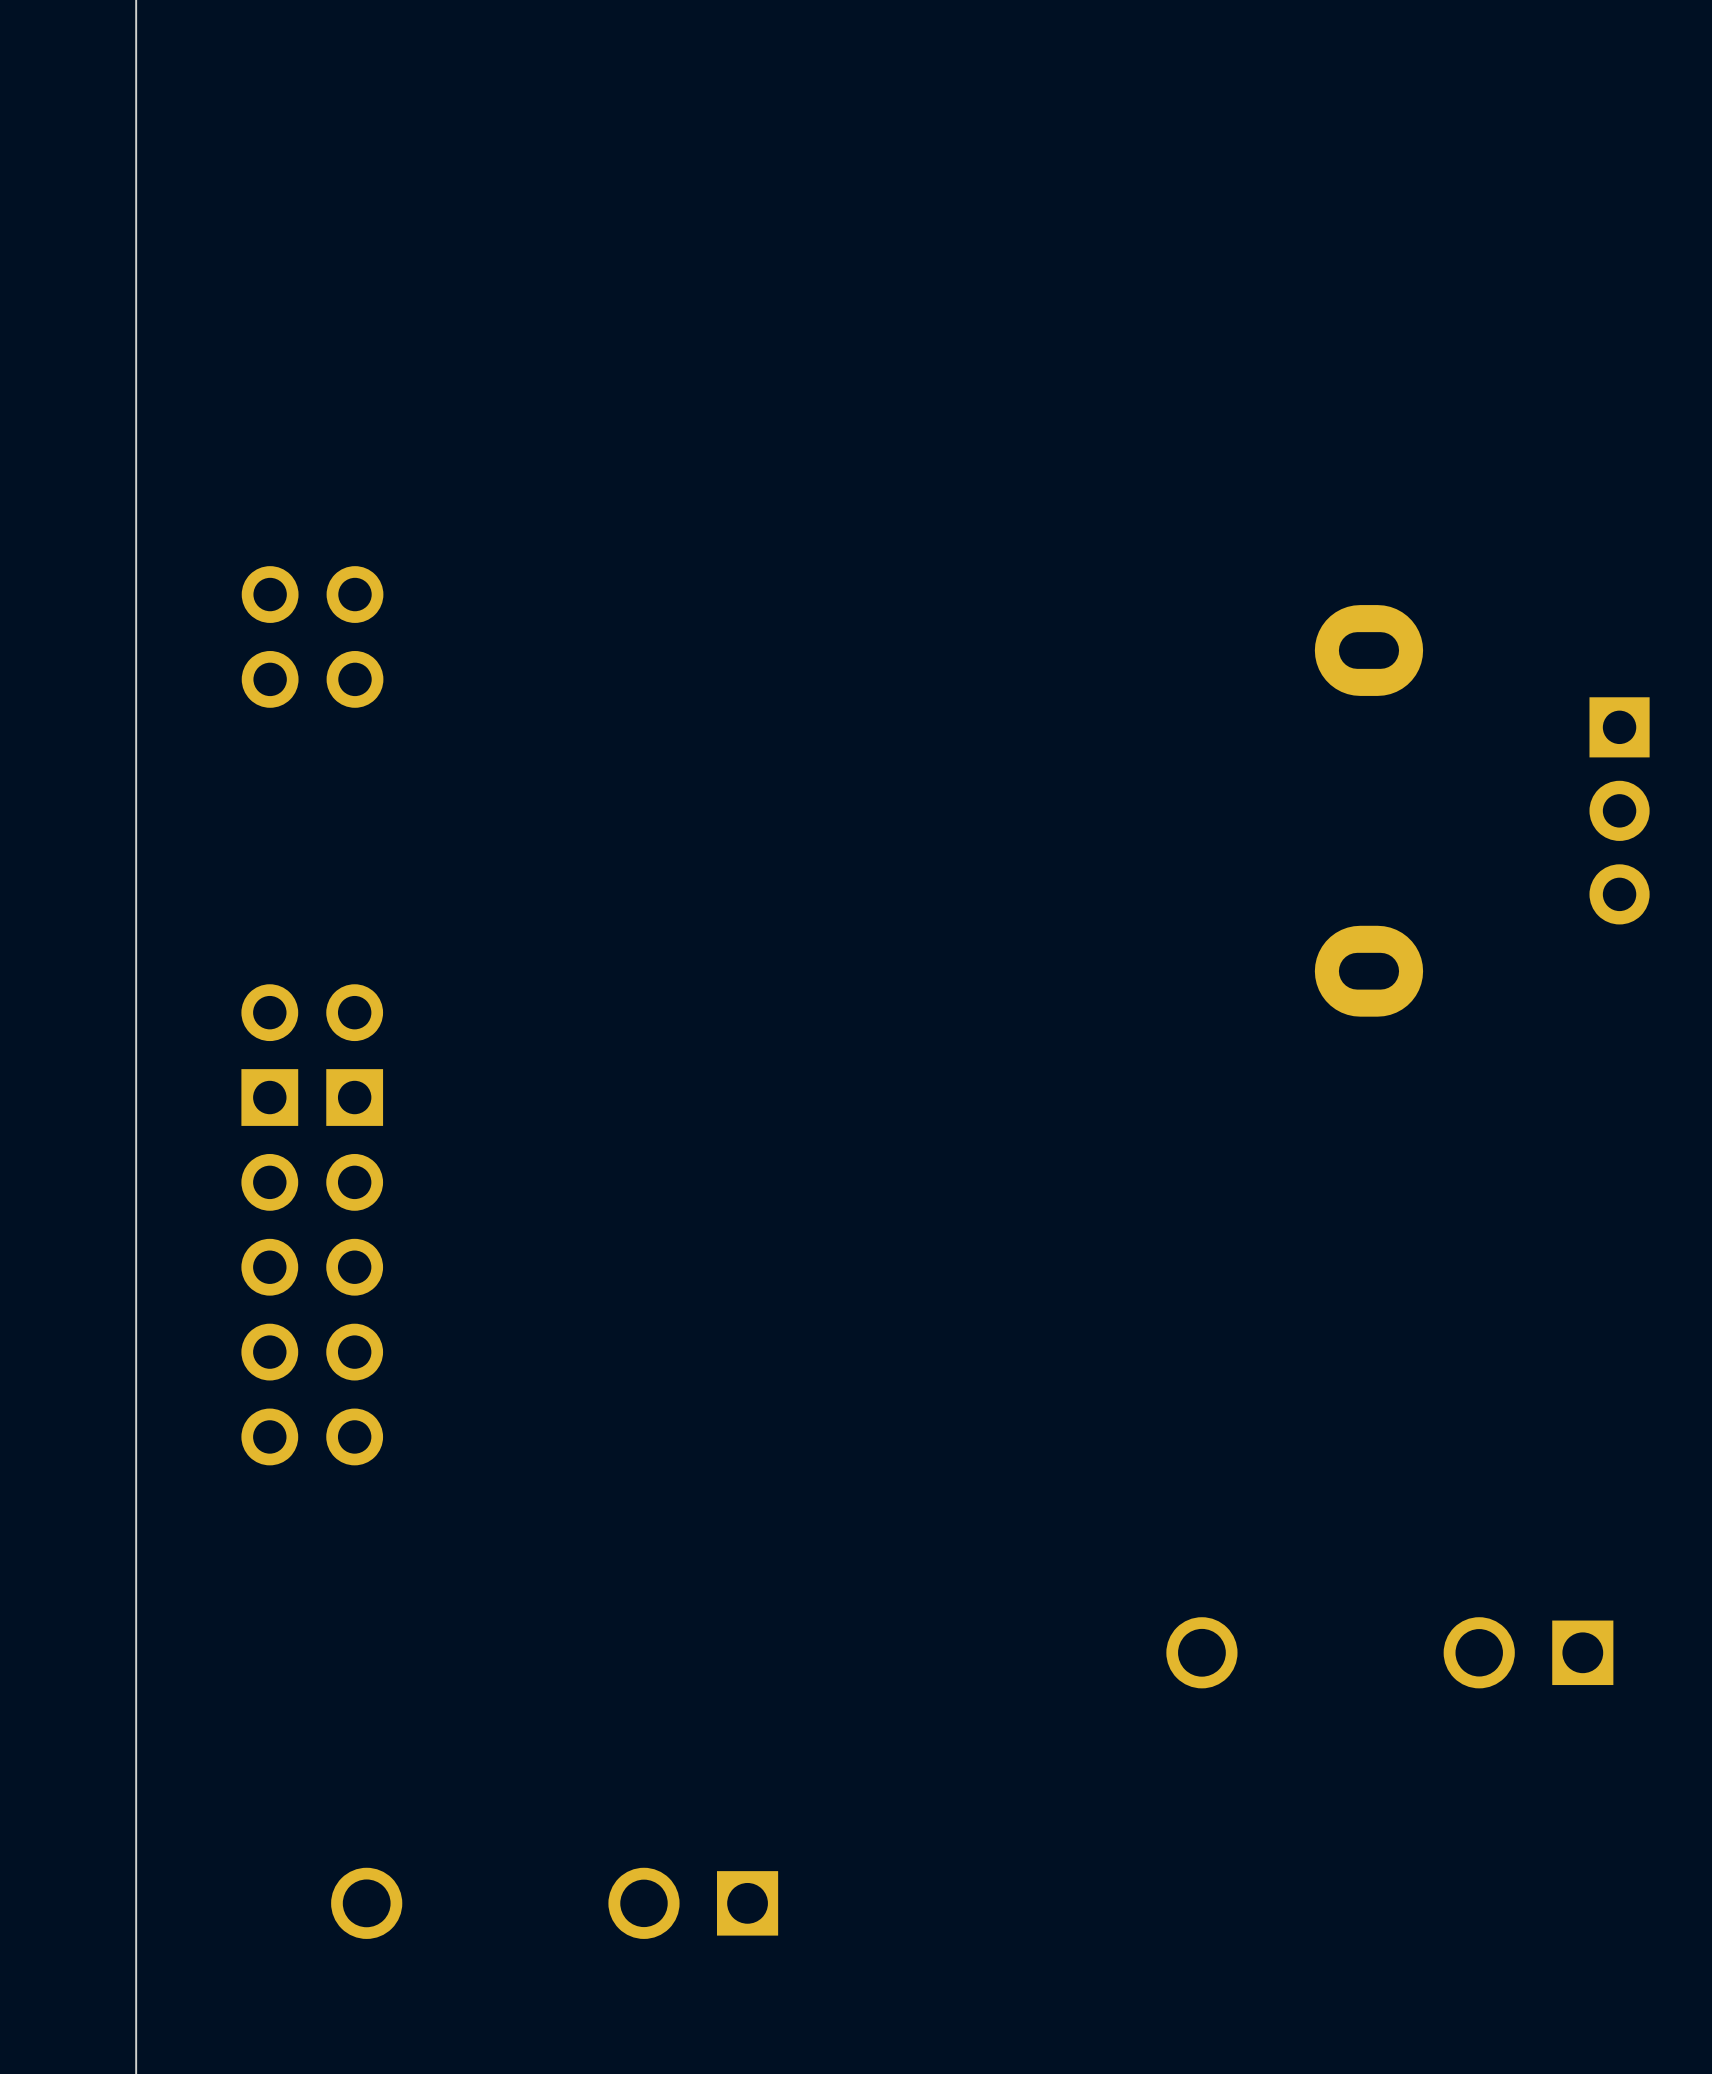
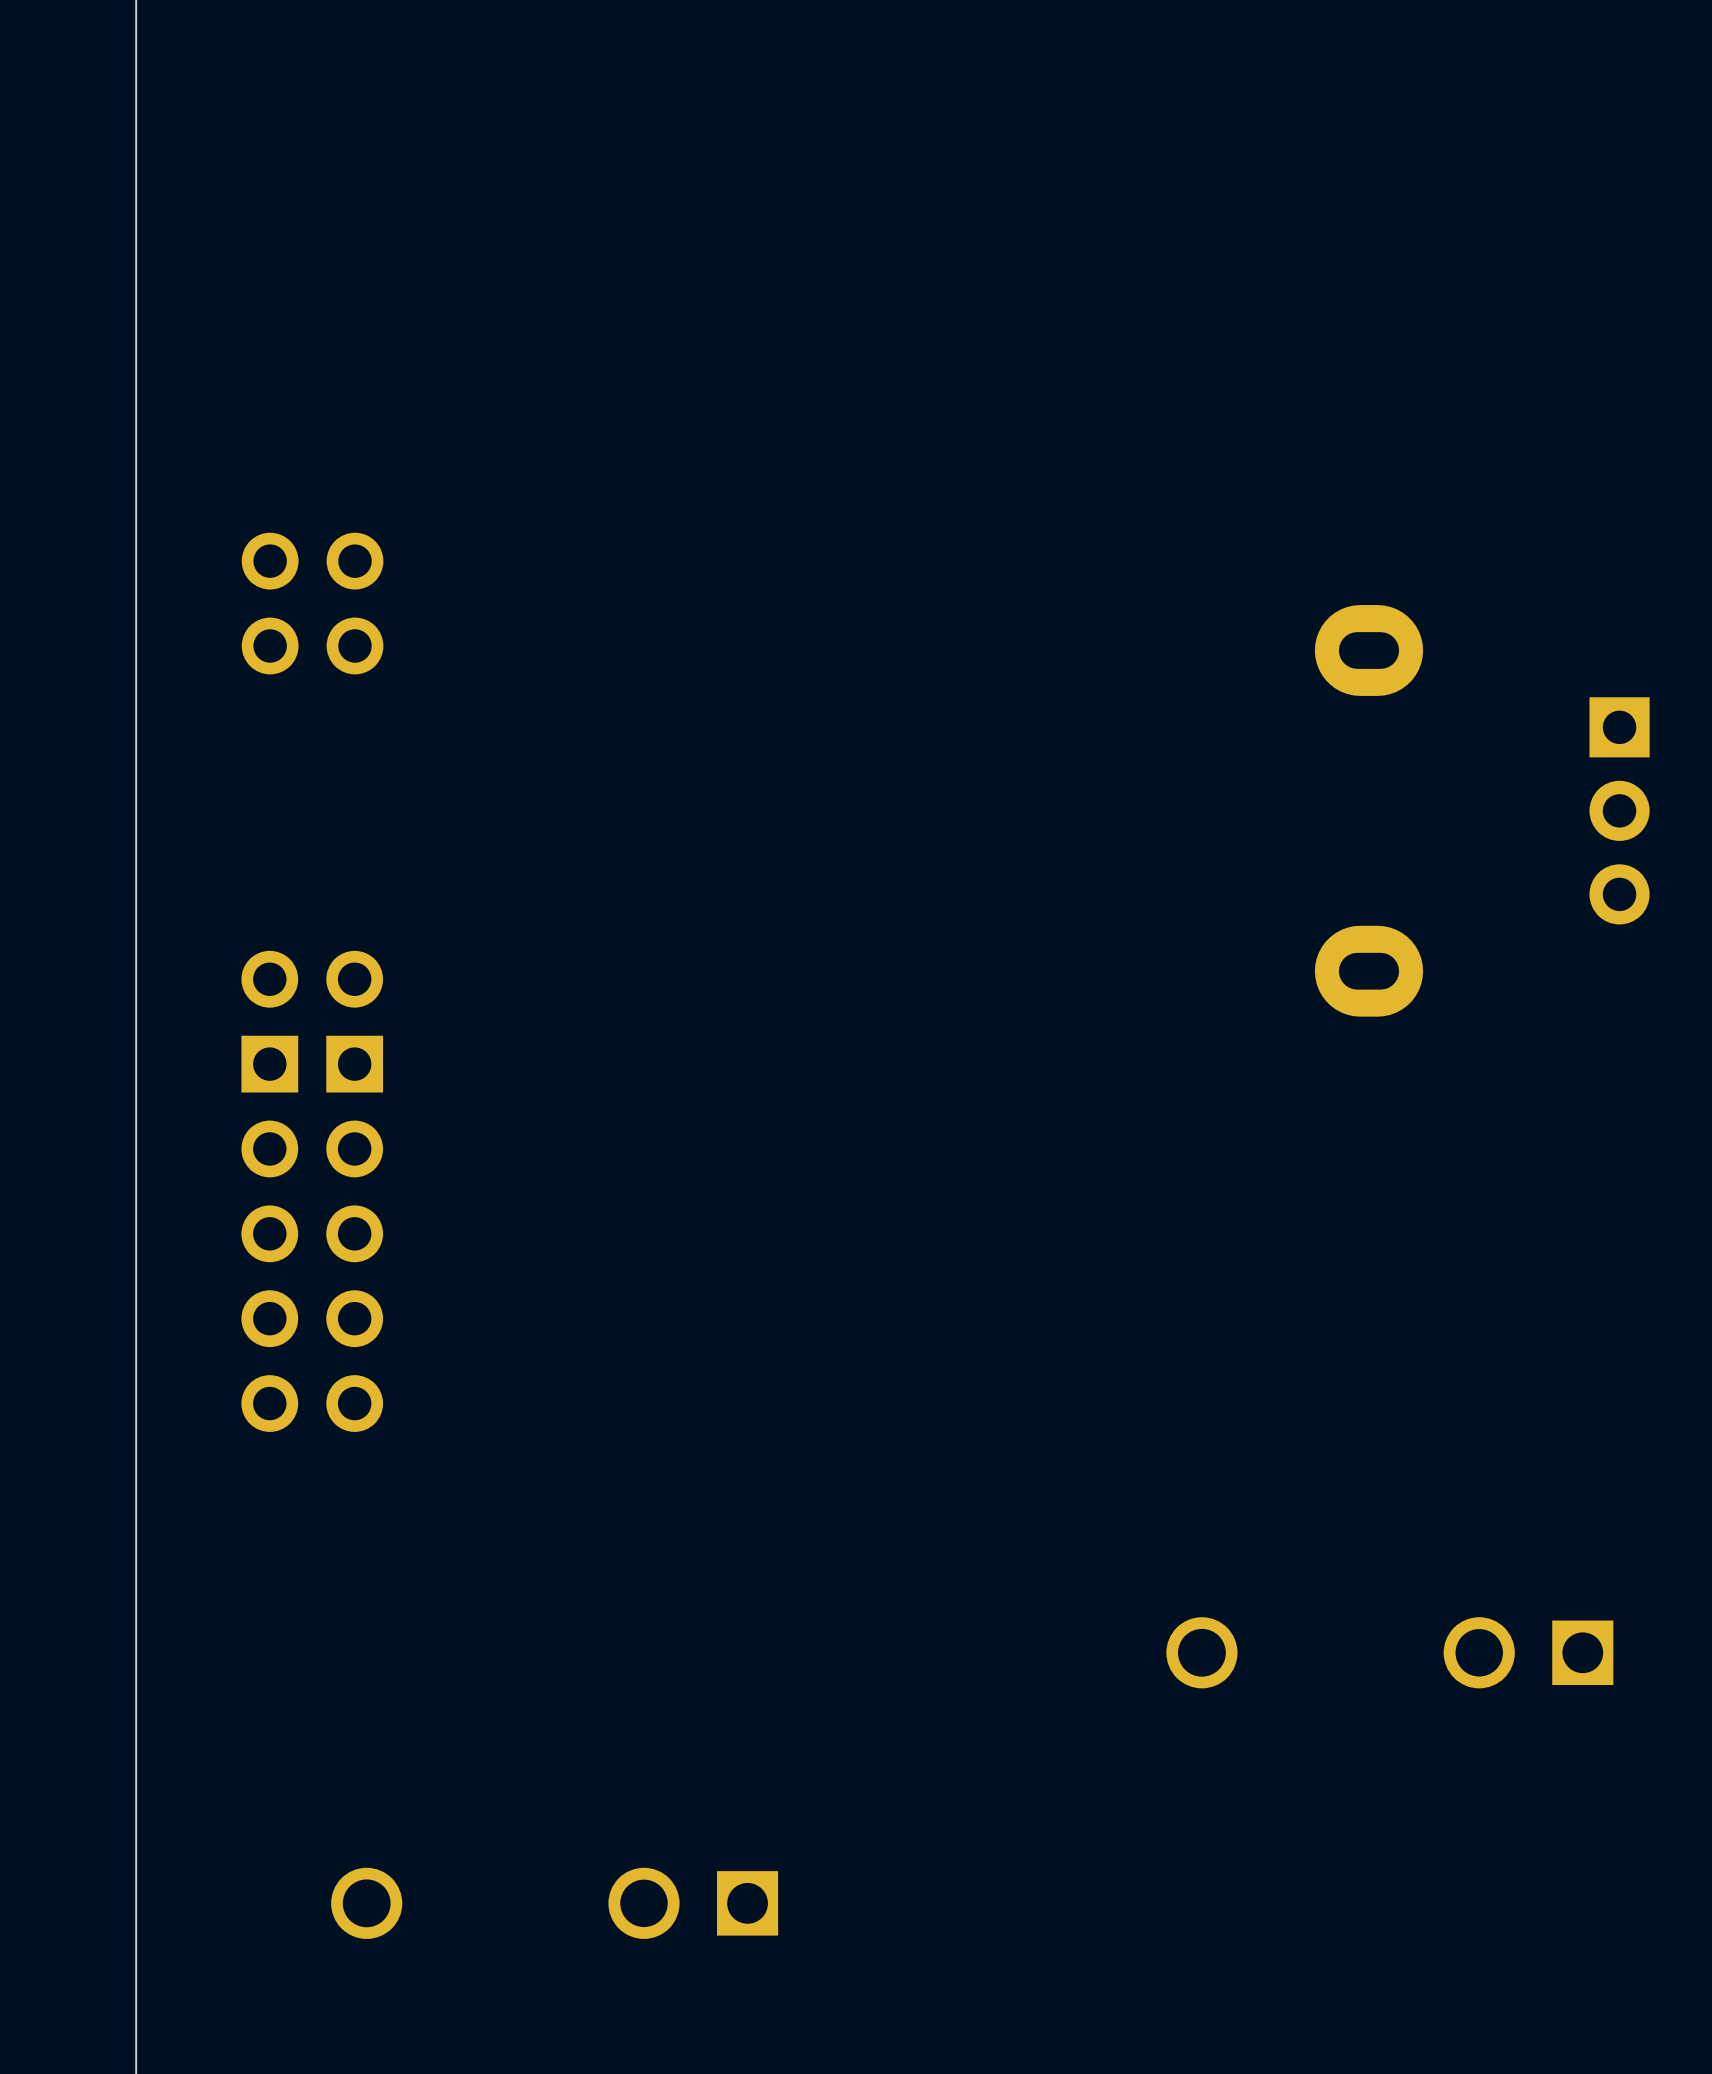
part position: (312, 636) -> (312, 603)
part position: (312, 1224) -> (312, 1191)

